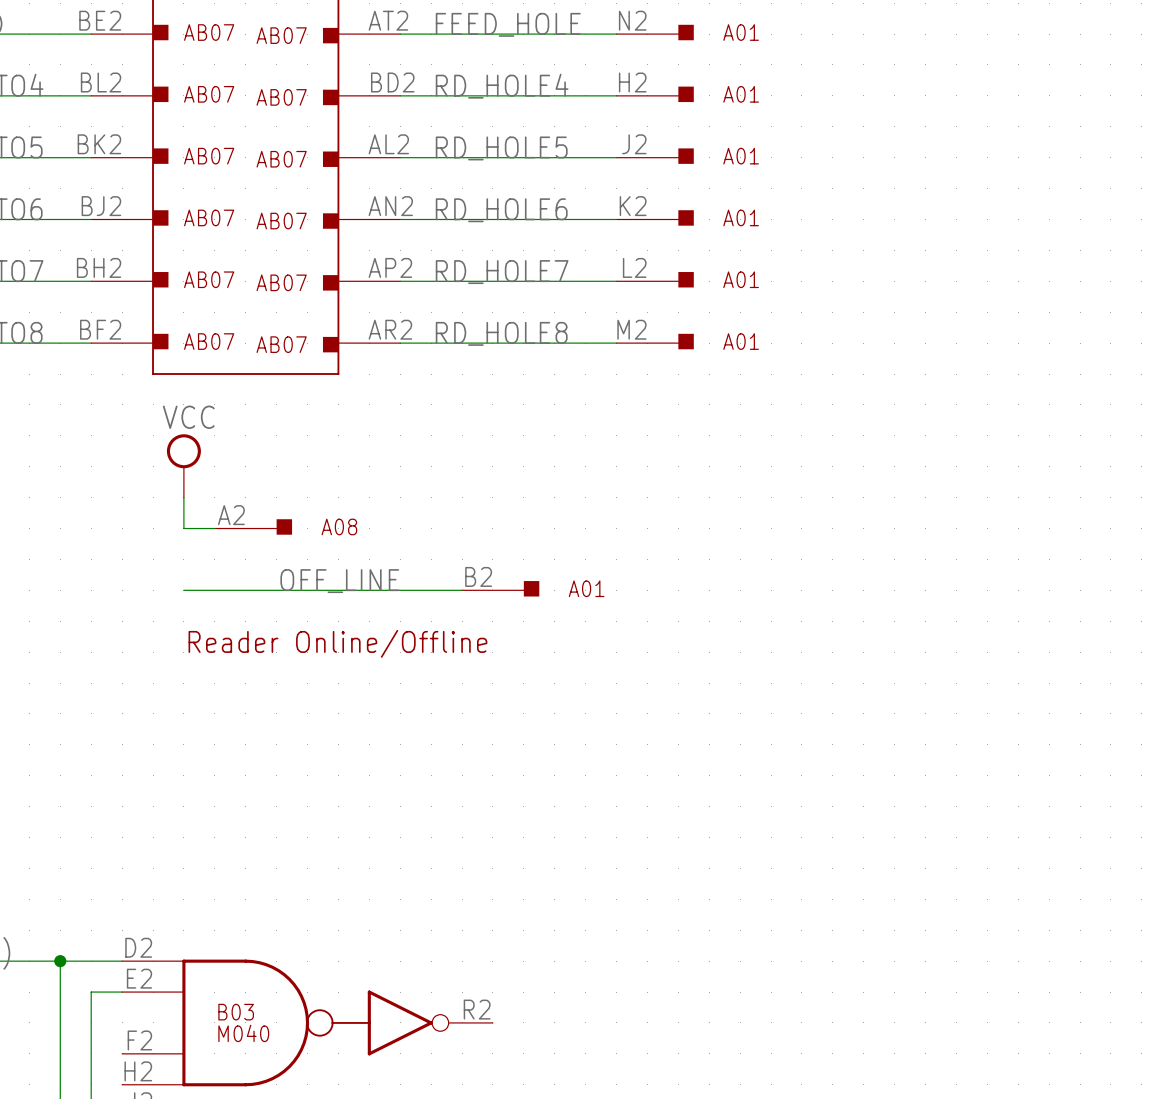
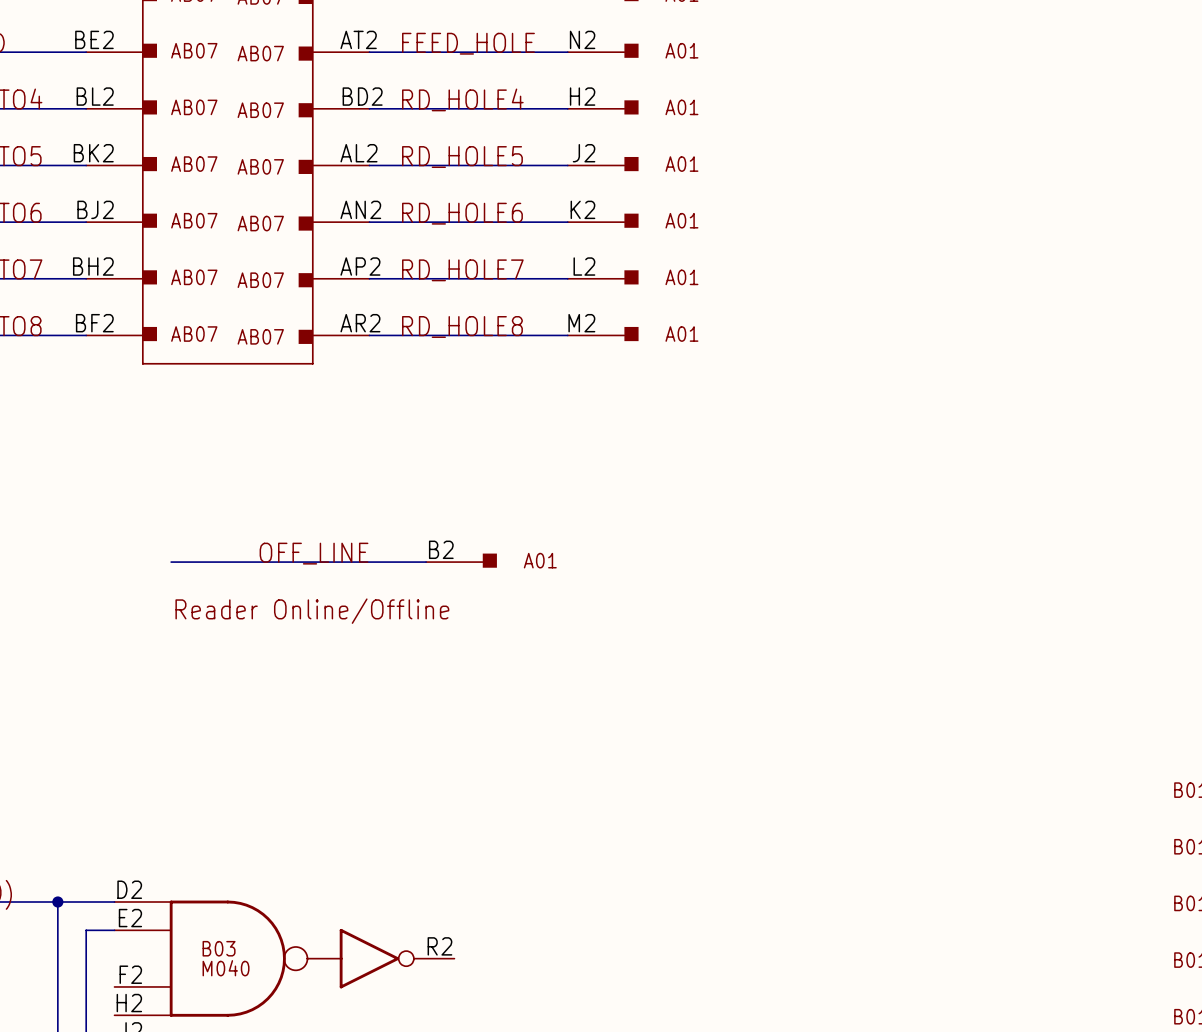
power symbol: VCC (183, 465) -> none
wire: (183, 497) (183, 528) (214, 528) -> none
A08: (253, 526) -> none

